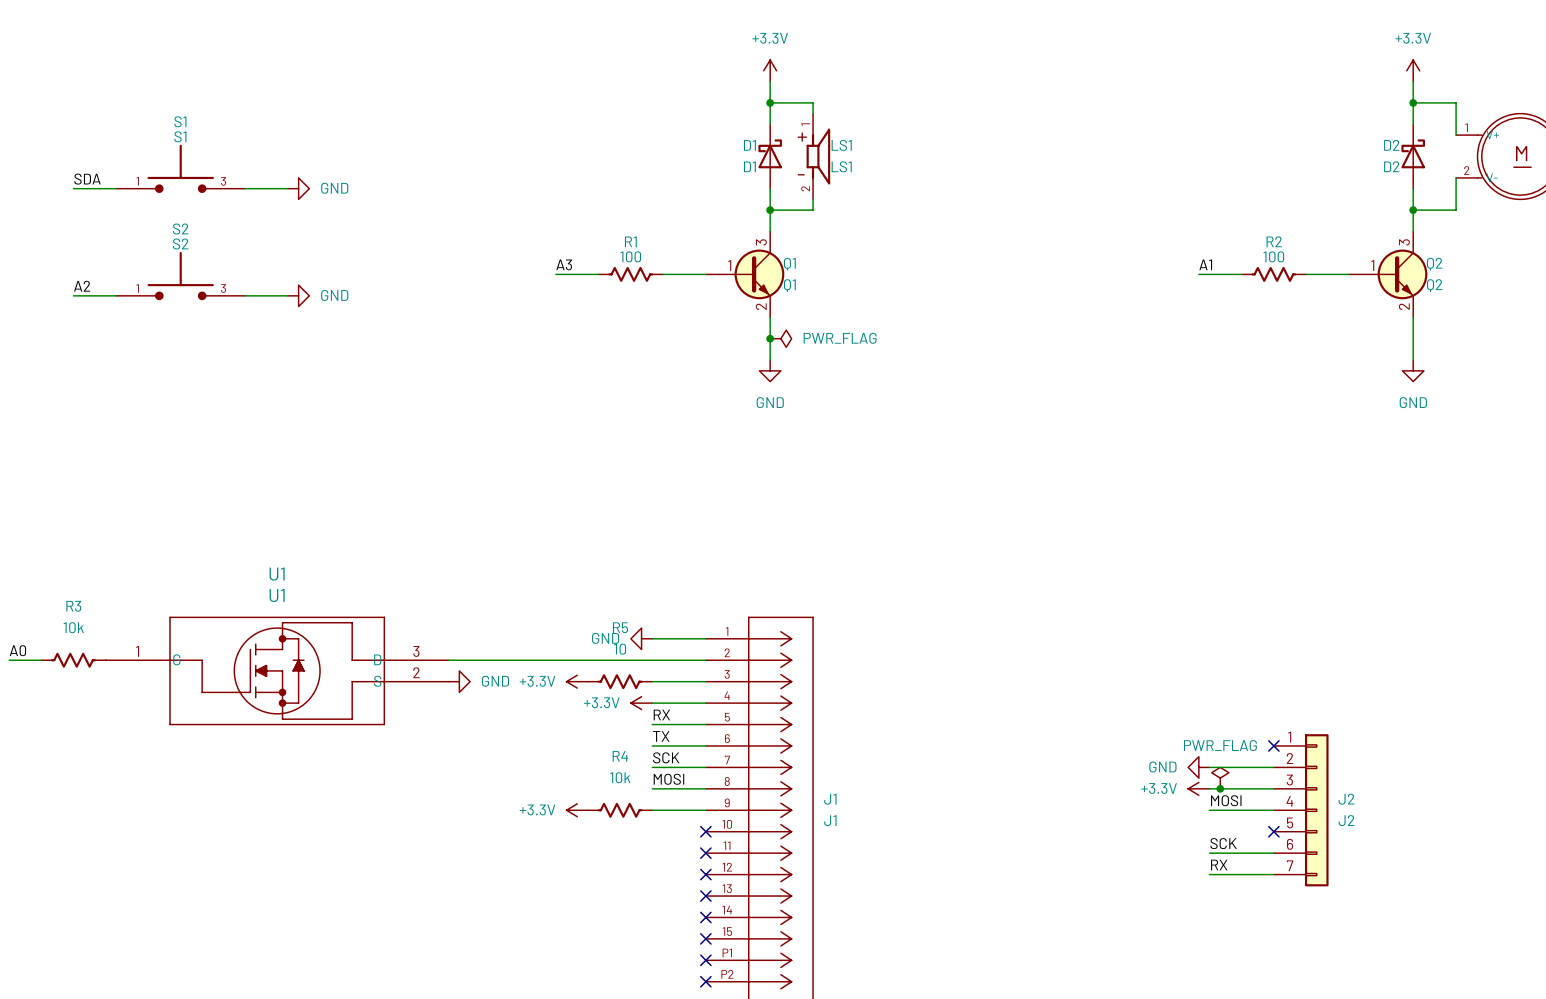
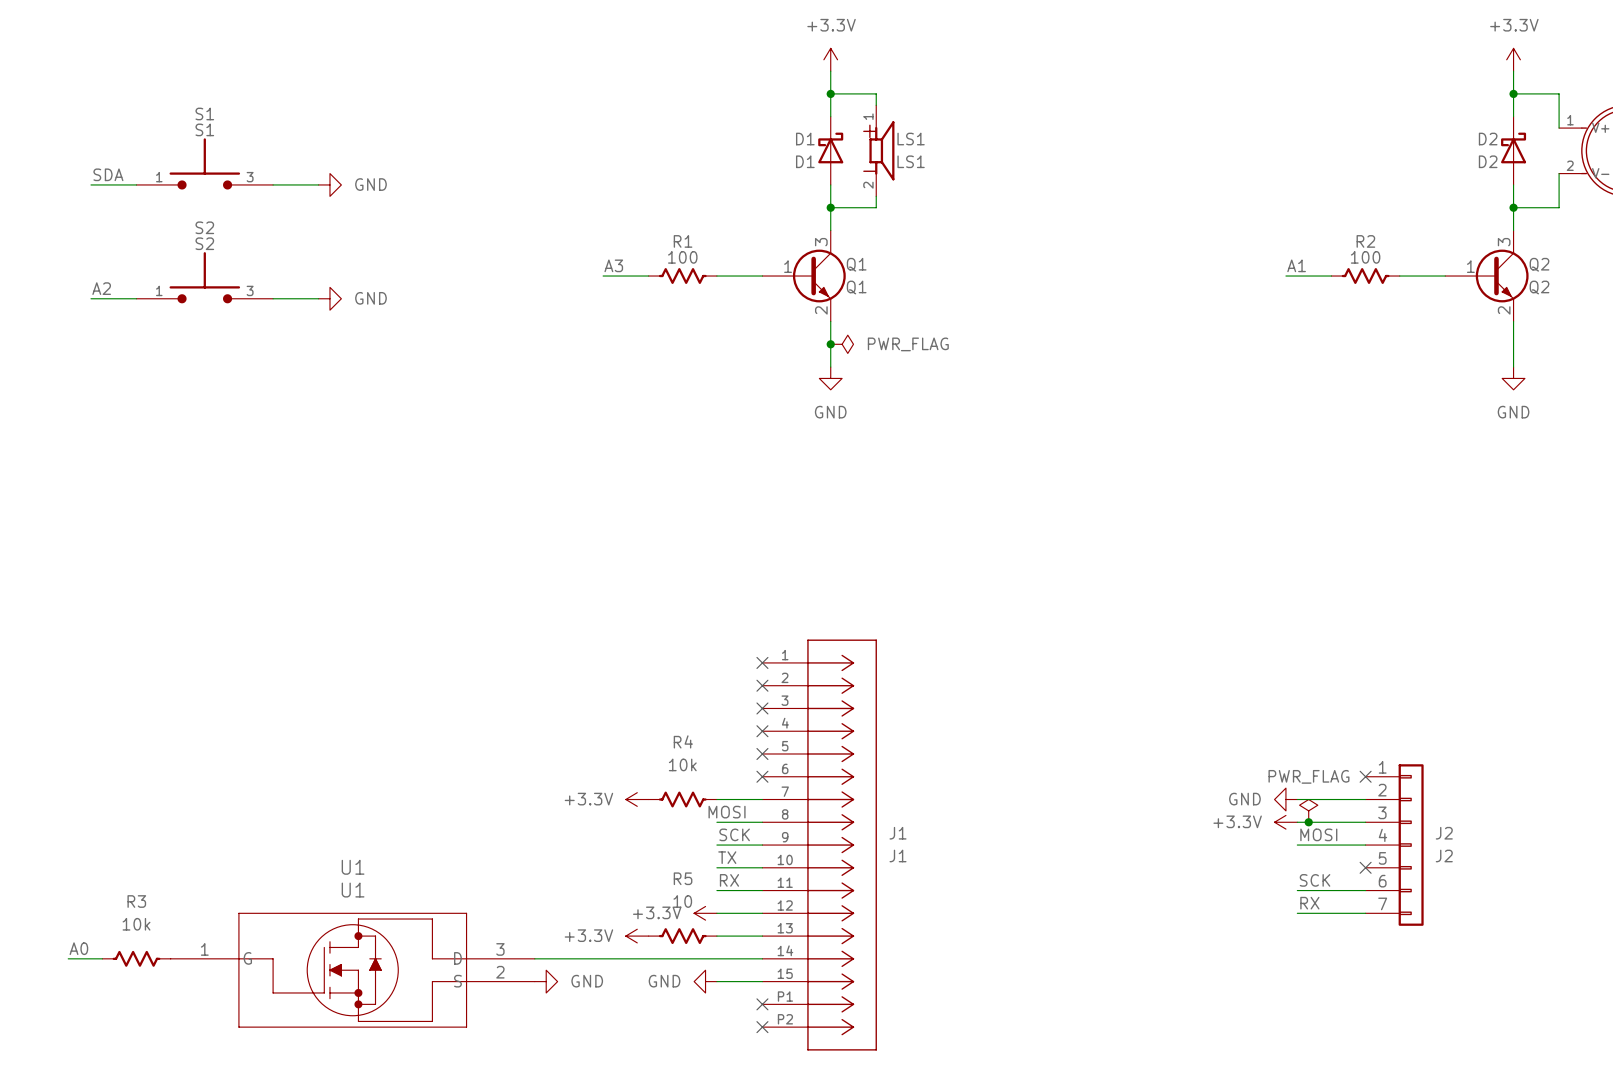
power symbol: GND (641, 638) -> none
wire: (652, 638) (705, 638) -> none
no-connect mark: none -> (762, 662)
label: A0 (17, 650) -> none
wire: (9, 660) (41, 660) -> none
R3 position: (73, 660) -> (136, 958)
wire: (448, 660) (705, 660) -> none
no-connect mark: none -> (762, 685)
U1 position: (277, 670) -> (352, 970)
power symbol: GND (459, 681) -> none
power symbol: +3.3V (577, 681) -> none
R5 position: (620, 681) -> (682, 936)
wire: (652, 681) (705, 681) -> none
no-connect mark: none -> (762, 708)
power symbol: +3.3V (641, 703) -> none
wire: (652, 703) (705, 703) -> none
no-connect mark: none -> (762, 731)
label position: RX (661, 714) -> RX (729, 880)
wire: (652, 724) (705, 724) -> none
no-connect mark: none -> (762, 753)
label position: TX (661, 736) -> TX (727, 857)
wire: (652, 745) (705, 745) -> none
no-connect mark: none -> (762, 776)
label position: SCK (666, 757) -> SCK (734, 834)
power symbol: none -> +3.3V (637, 799)
wire: (652, 788) (662, 788) -> none
power symbol: +3.3V (577, 810) -> none
R4 position: (620, 810) -> (682, 799)
wire: (652, 810) (662, 810) -> none
wire: none -> (716, 867) (762, 867)
no-connect mark: (705, 831) -> none
wire: none -> (716, 890) (762, 890)
no-connect mark: (705, 853) -> none
power symbol: none -> +3.3V (705, 913)
wire: none -> (716, 913) (762, 913)
no-connect mark: (705, 874) -> none
power symbol: none -> +3.3V (637, 936)
wire: none -> (716, 936) (762, 936)
no-connect mark: (705, 896) -> none
label: none -> A0 (78, 948)
wire: none -> (68, 958) (102, 958)
wire: none -> (534, 958) (762, 958)
no-connect mark: (705, 917) -> none
power symbol: none -> GND (546, 981)
power symbol: none -> GND (705, 981)
wire: none -> (716, 981) (762, 981)
no-connect mark: (705, 938) -> none

